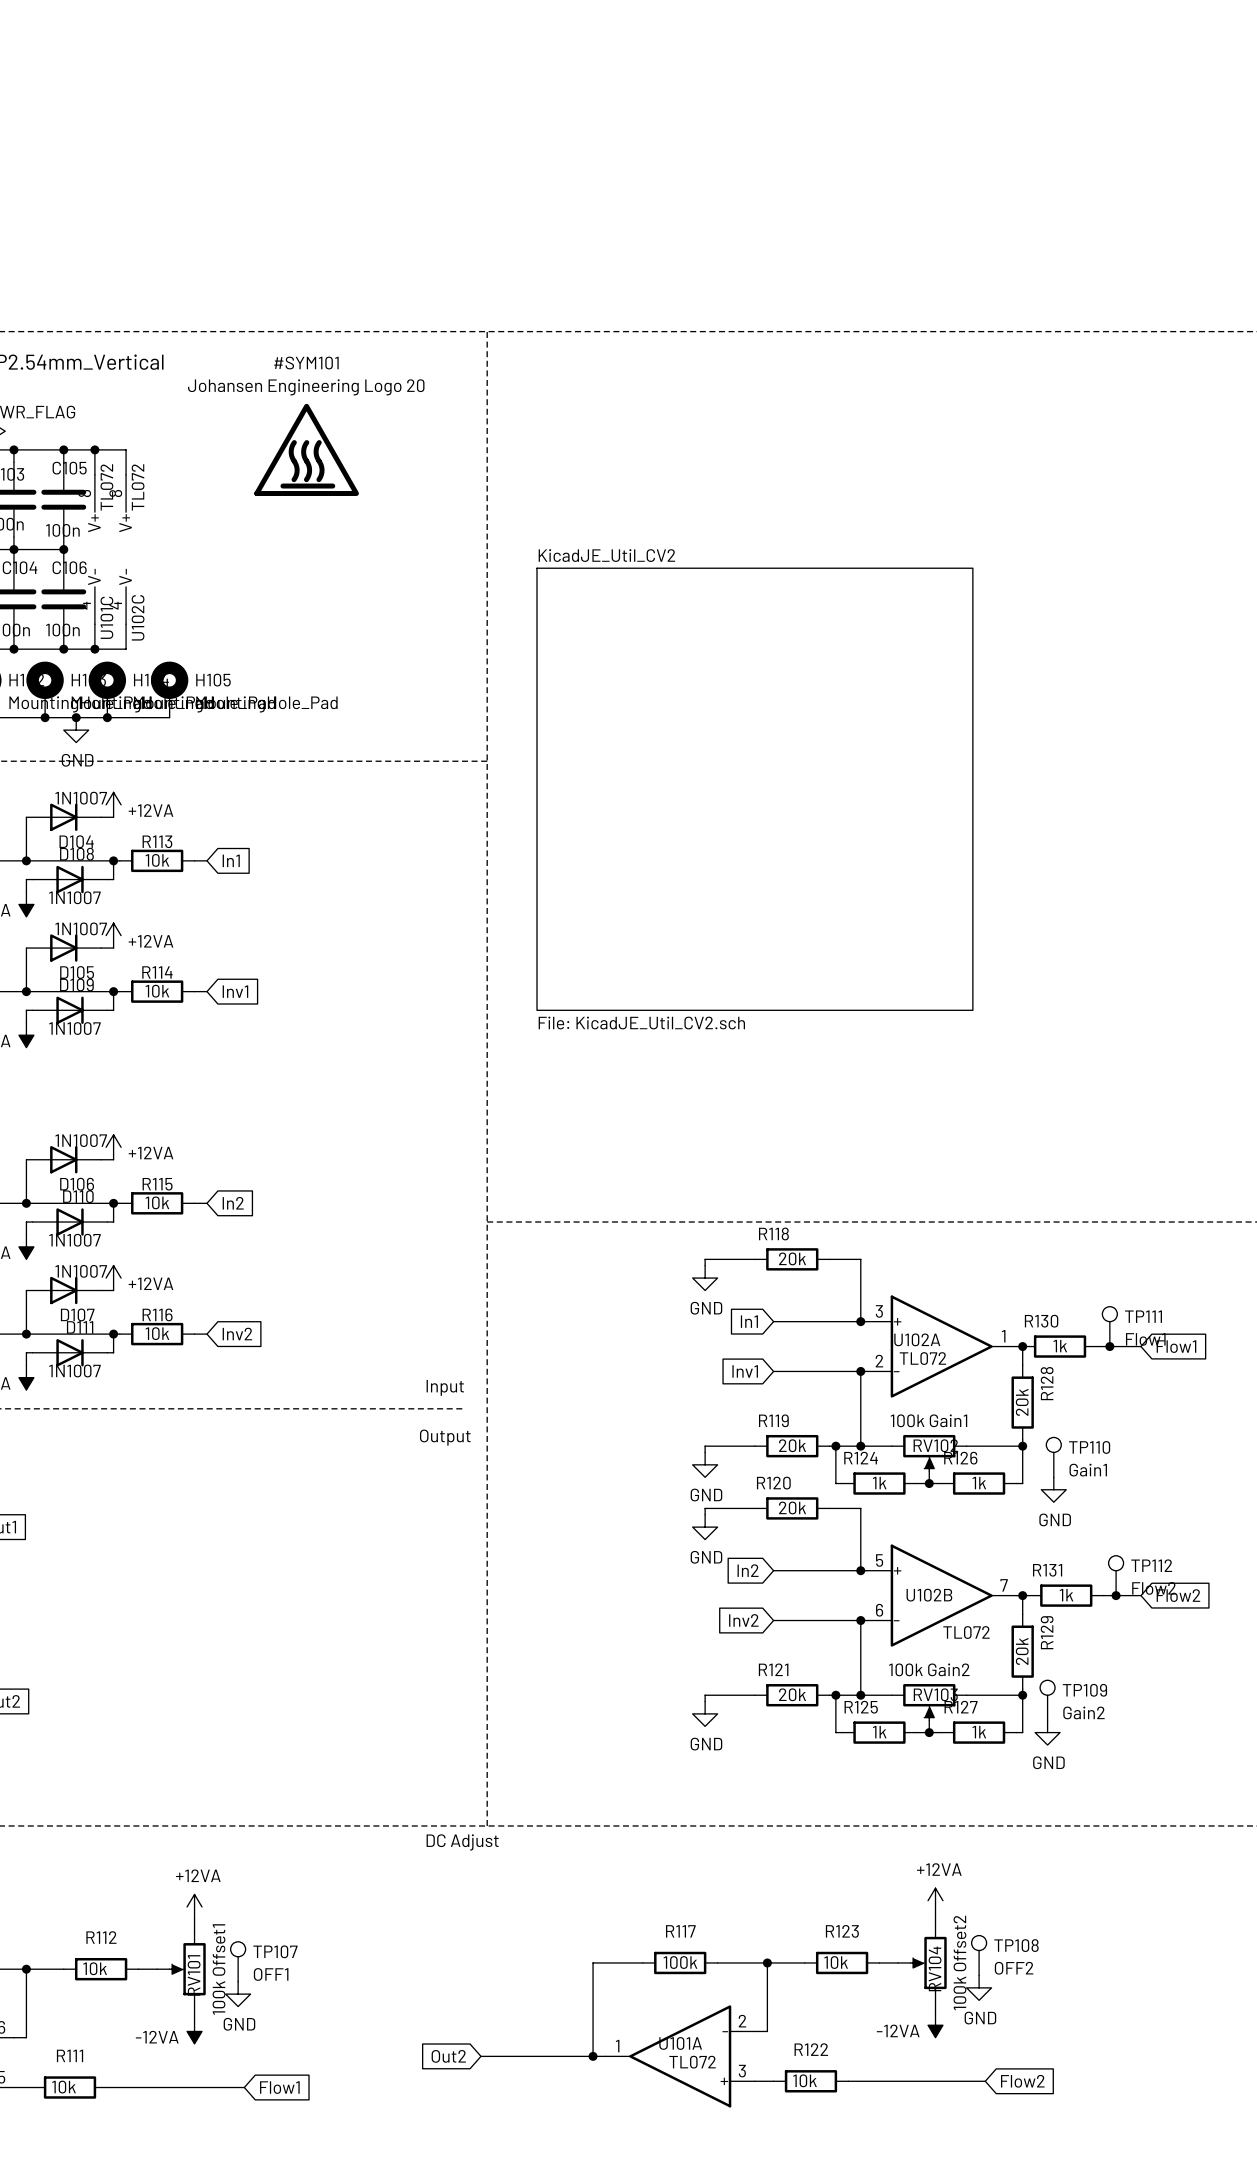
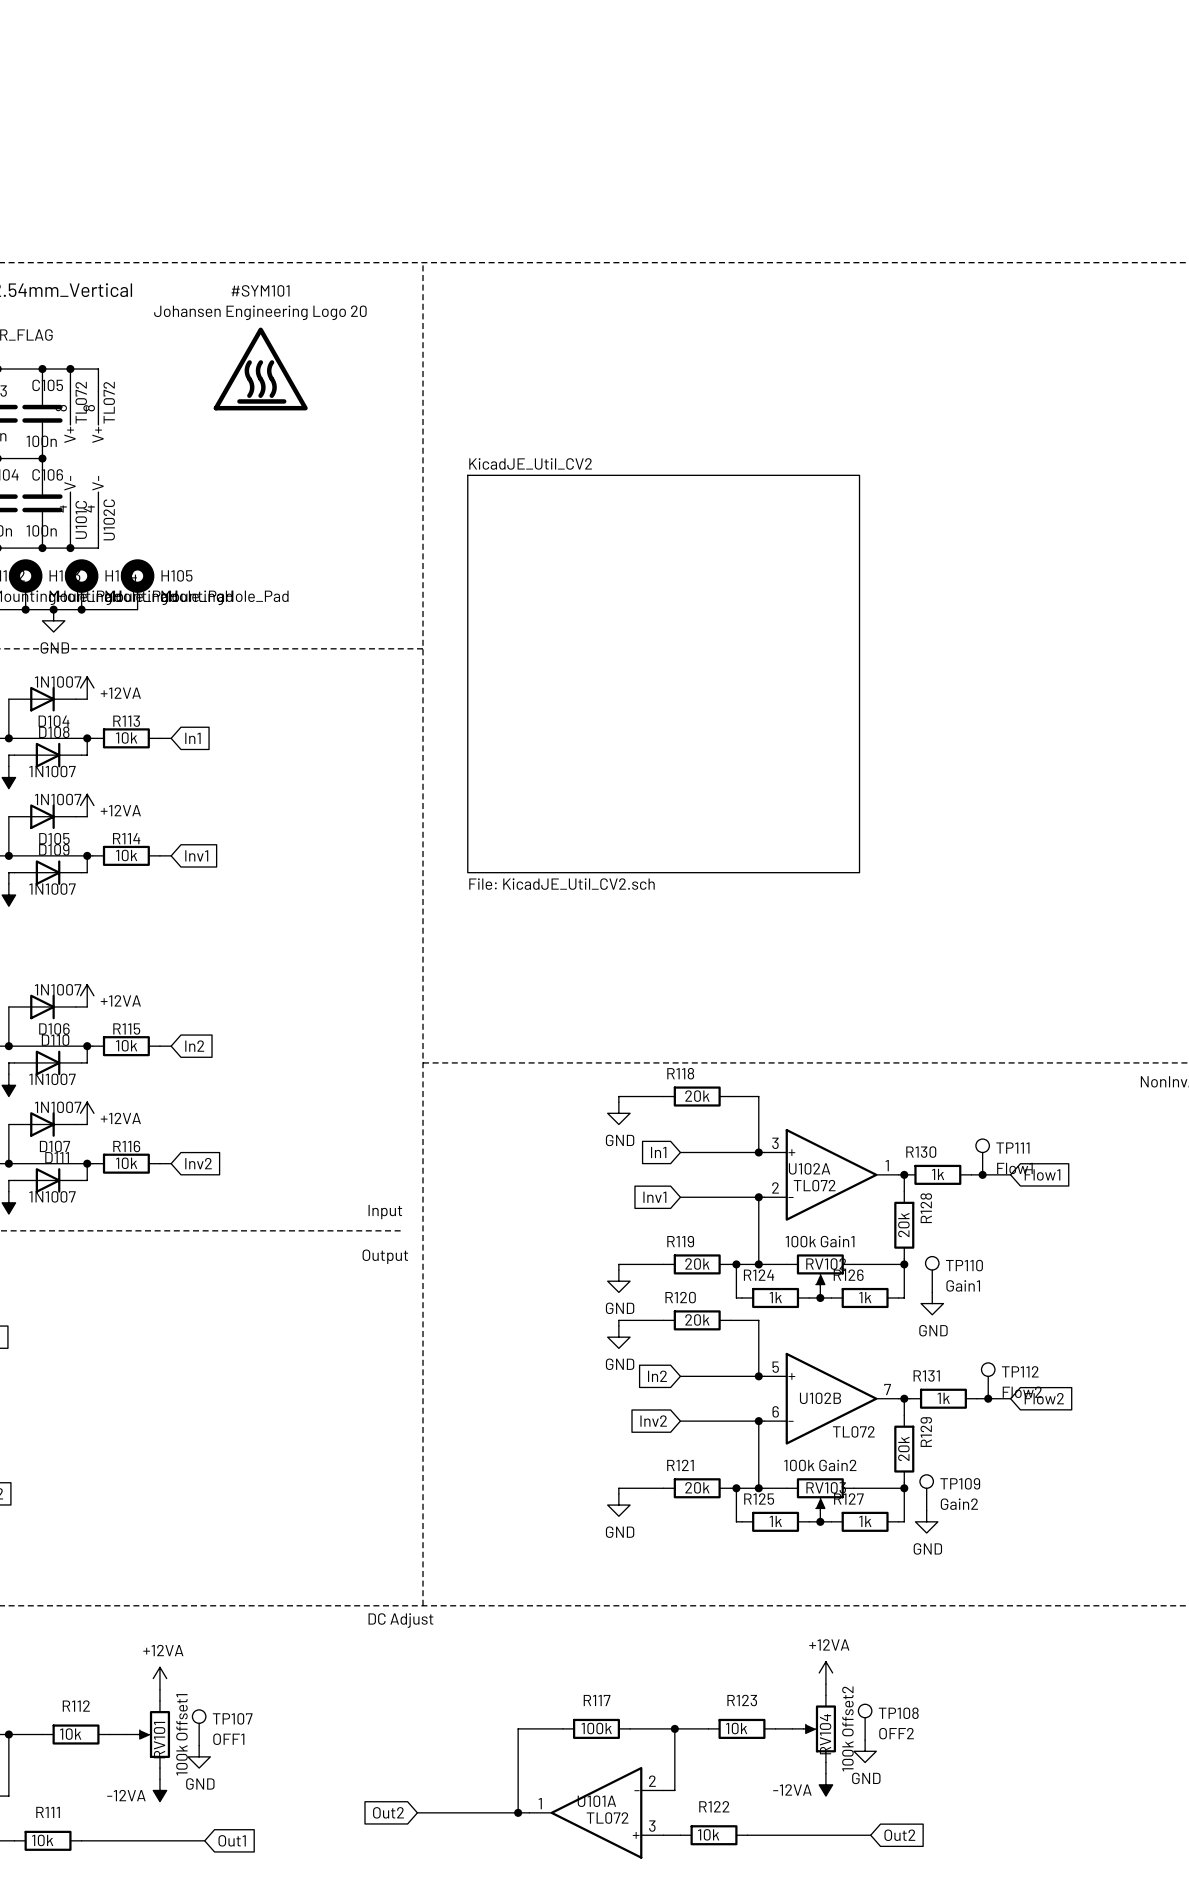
global label: Flow2 (1022, 2081) -> Out2 (899, 1835)
global label: Flow1 (279, 2087) -> Out1 (232, 1840)

